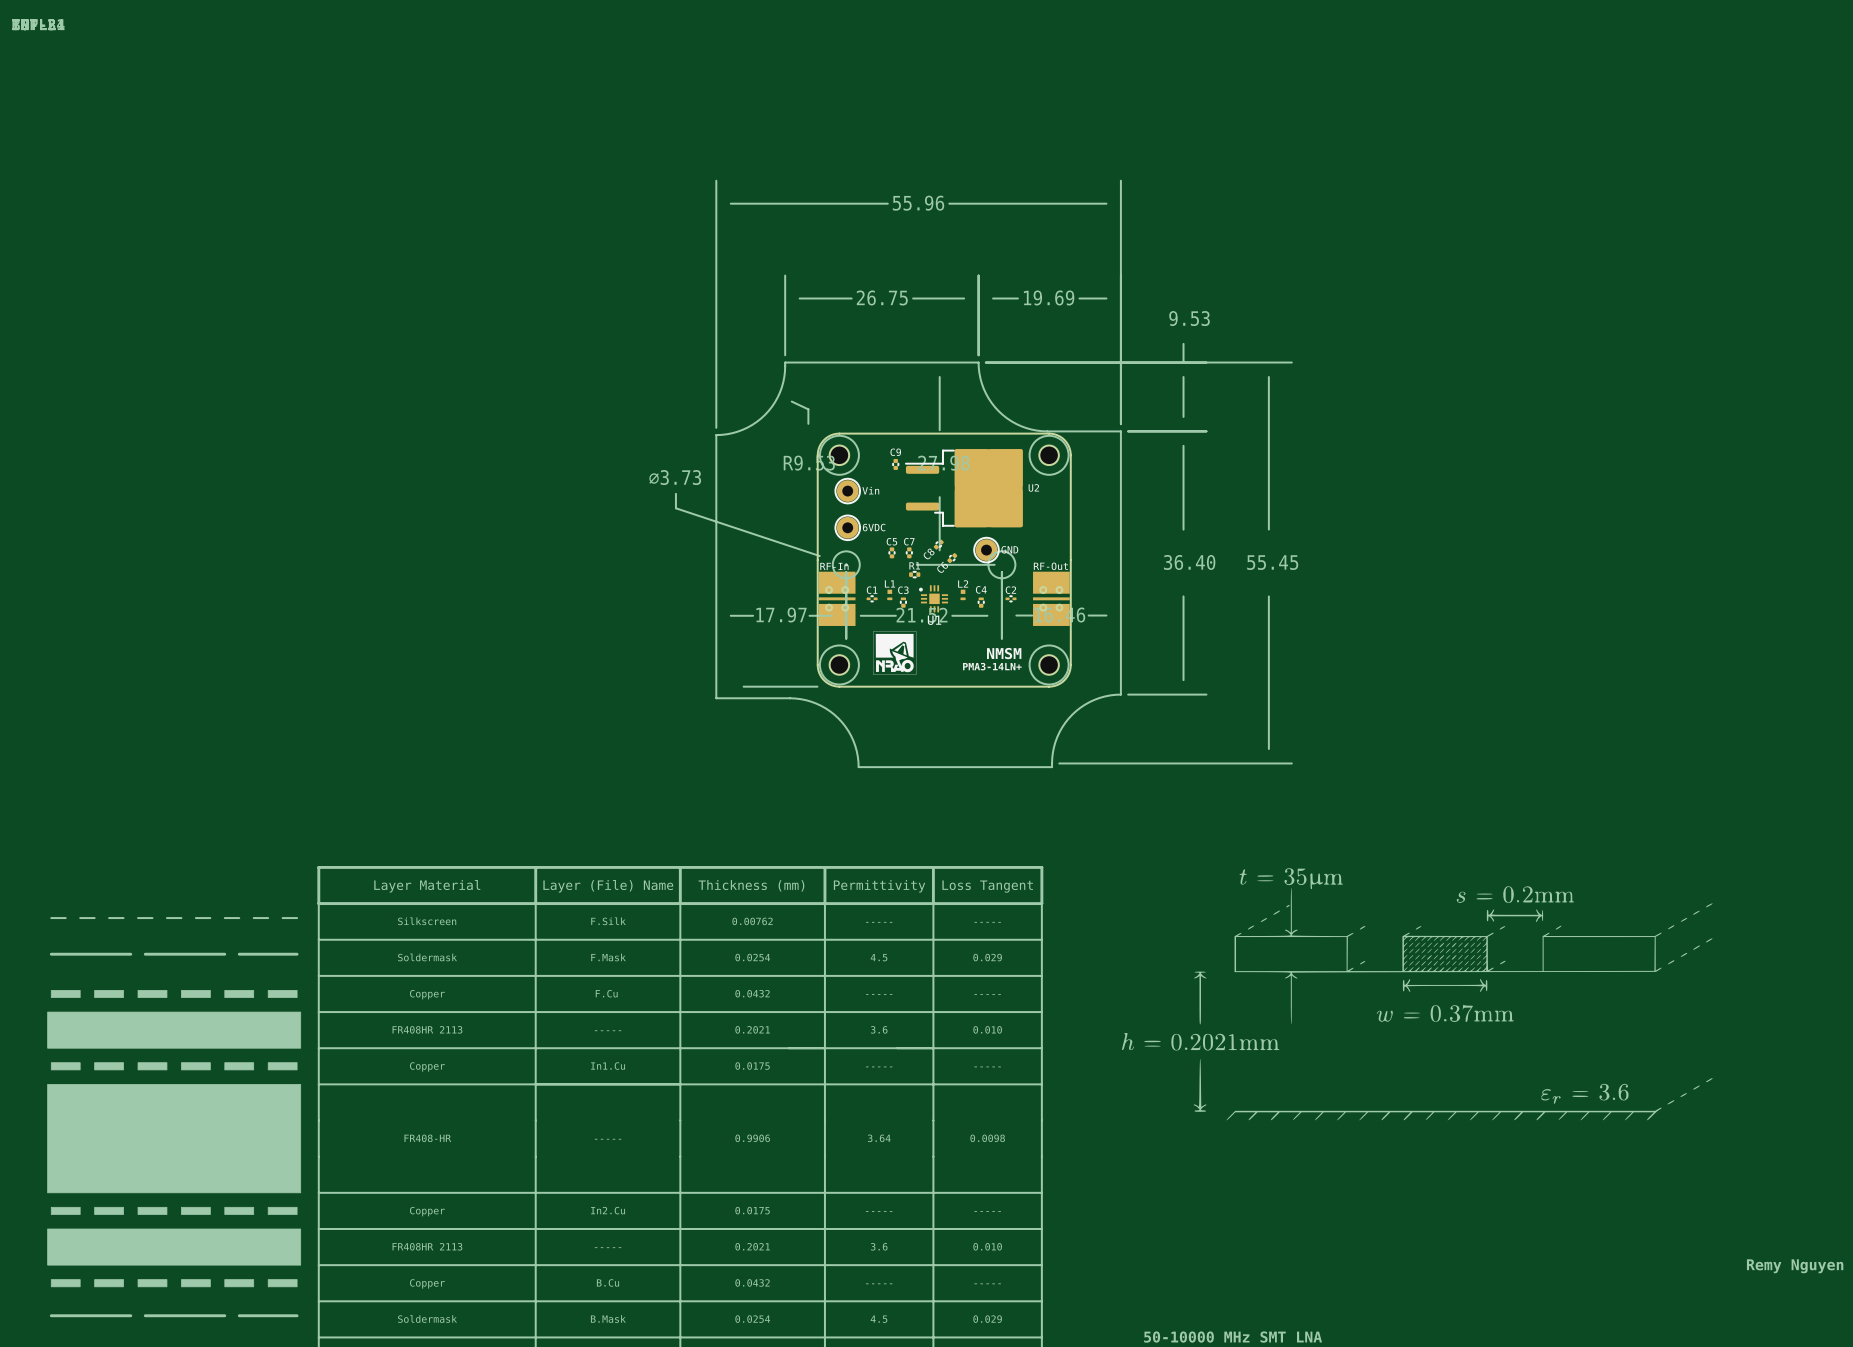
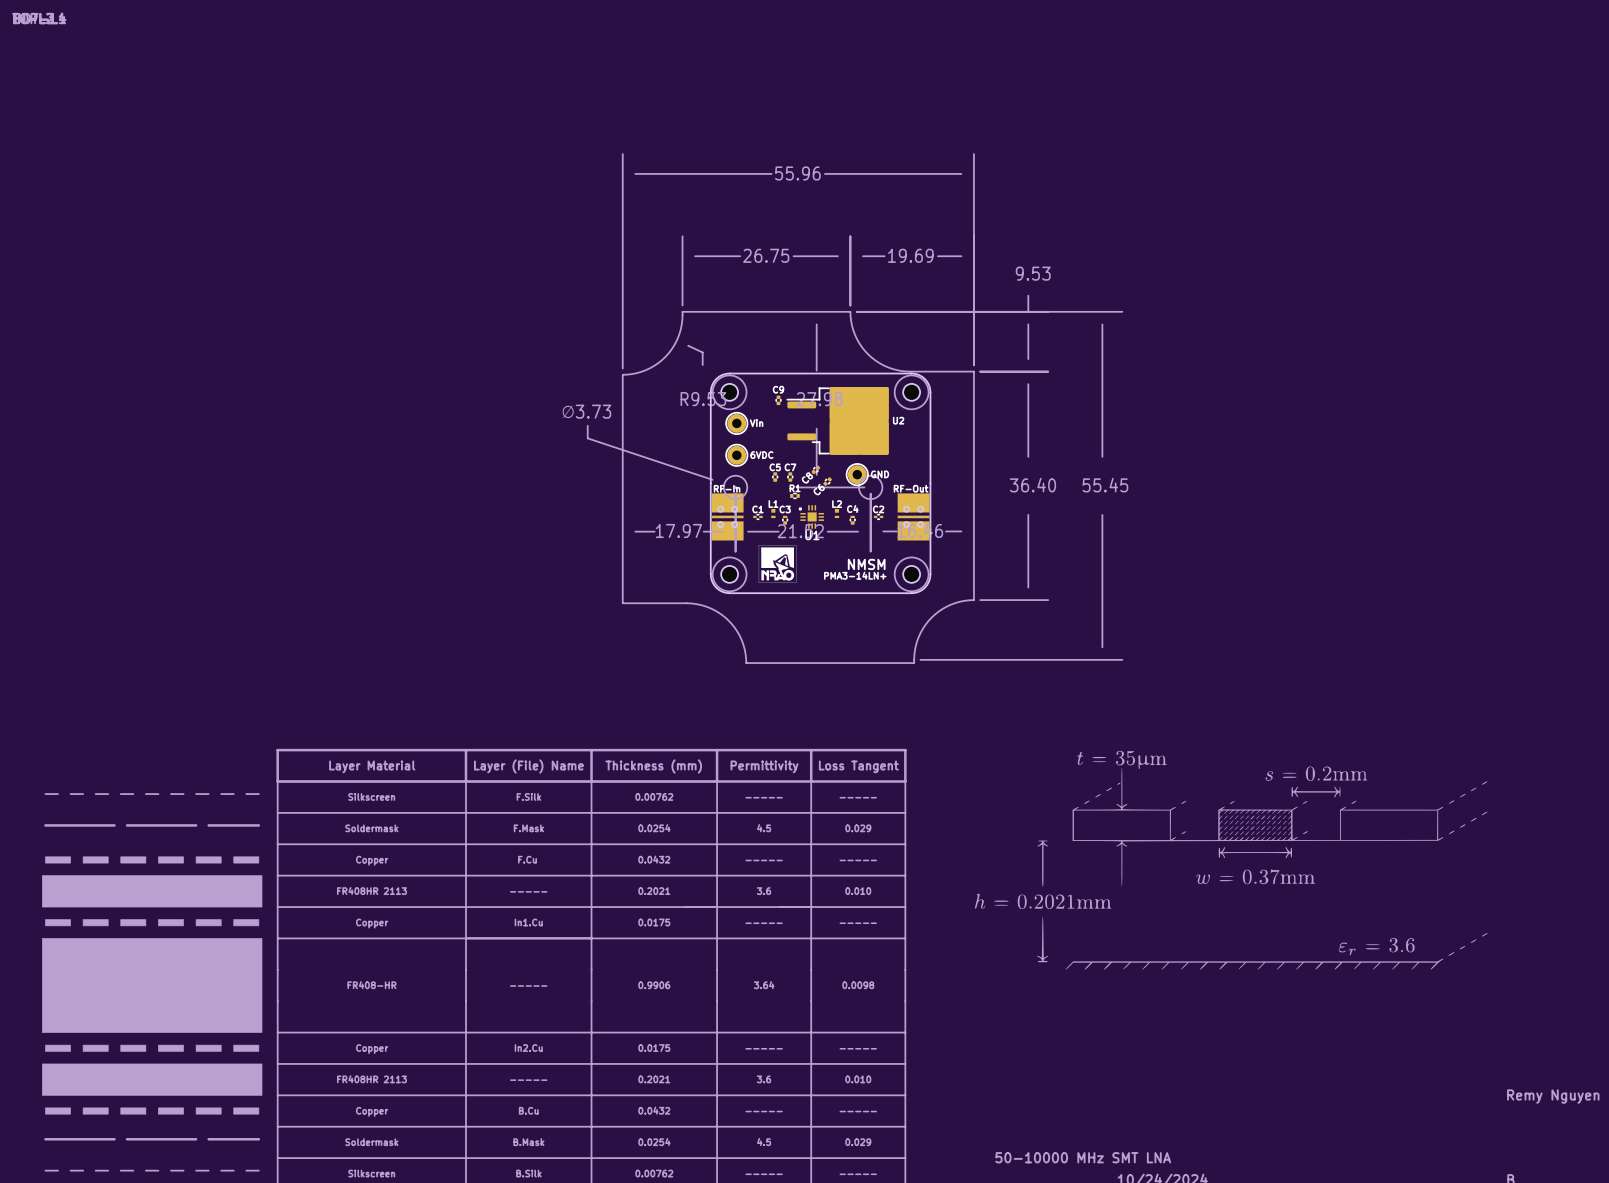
line: (743, 686) (817, 686) -> none

